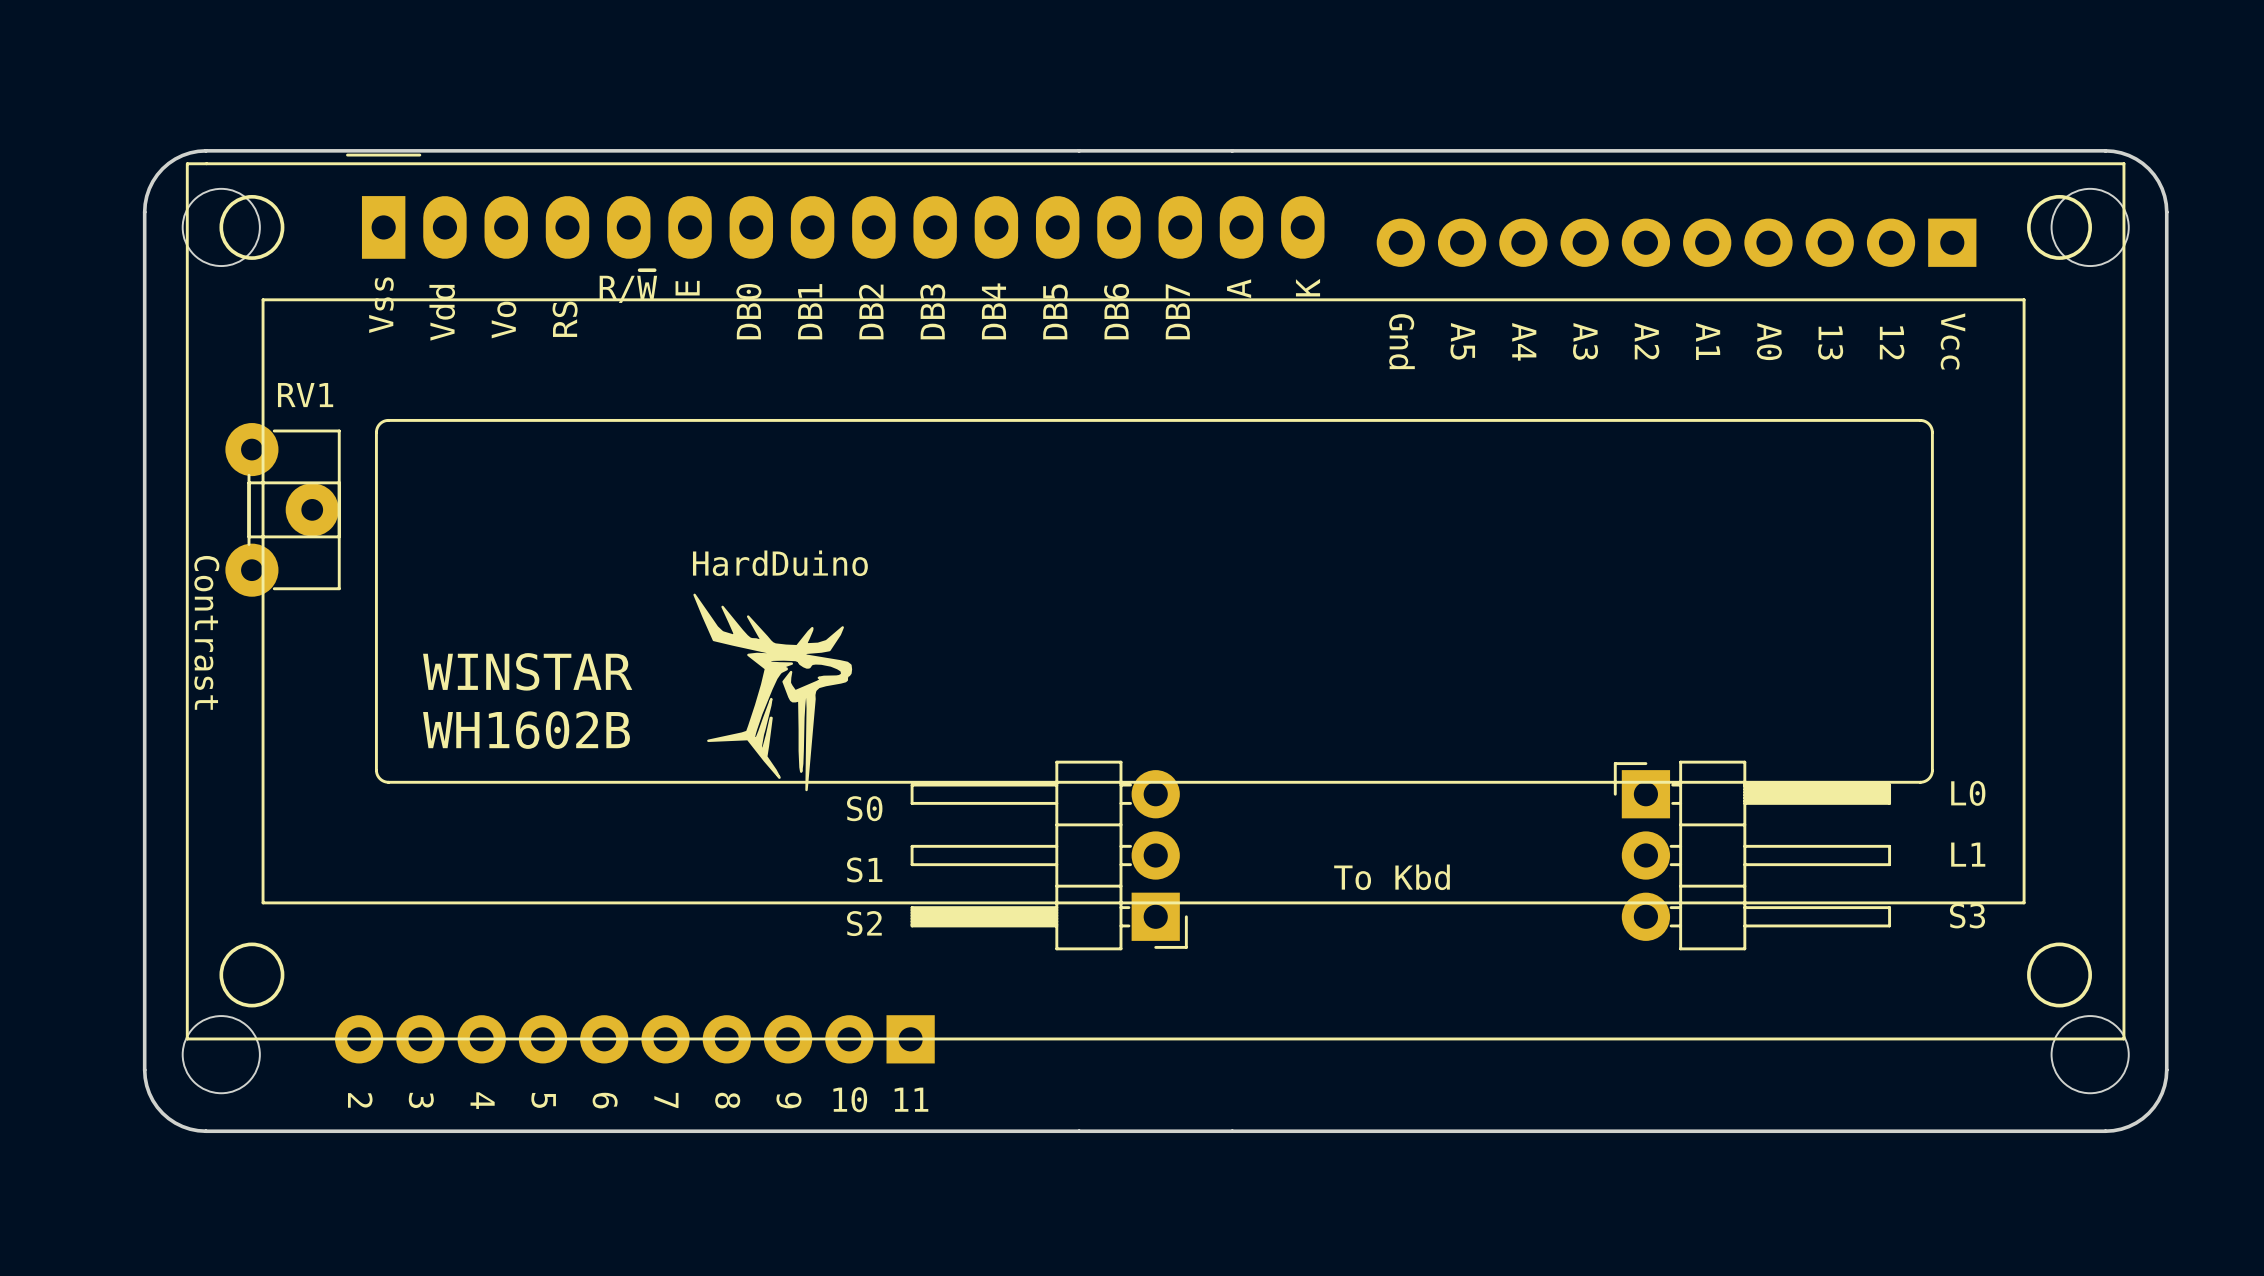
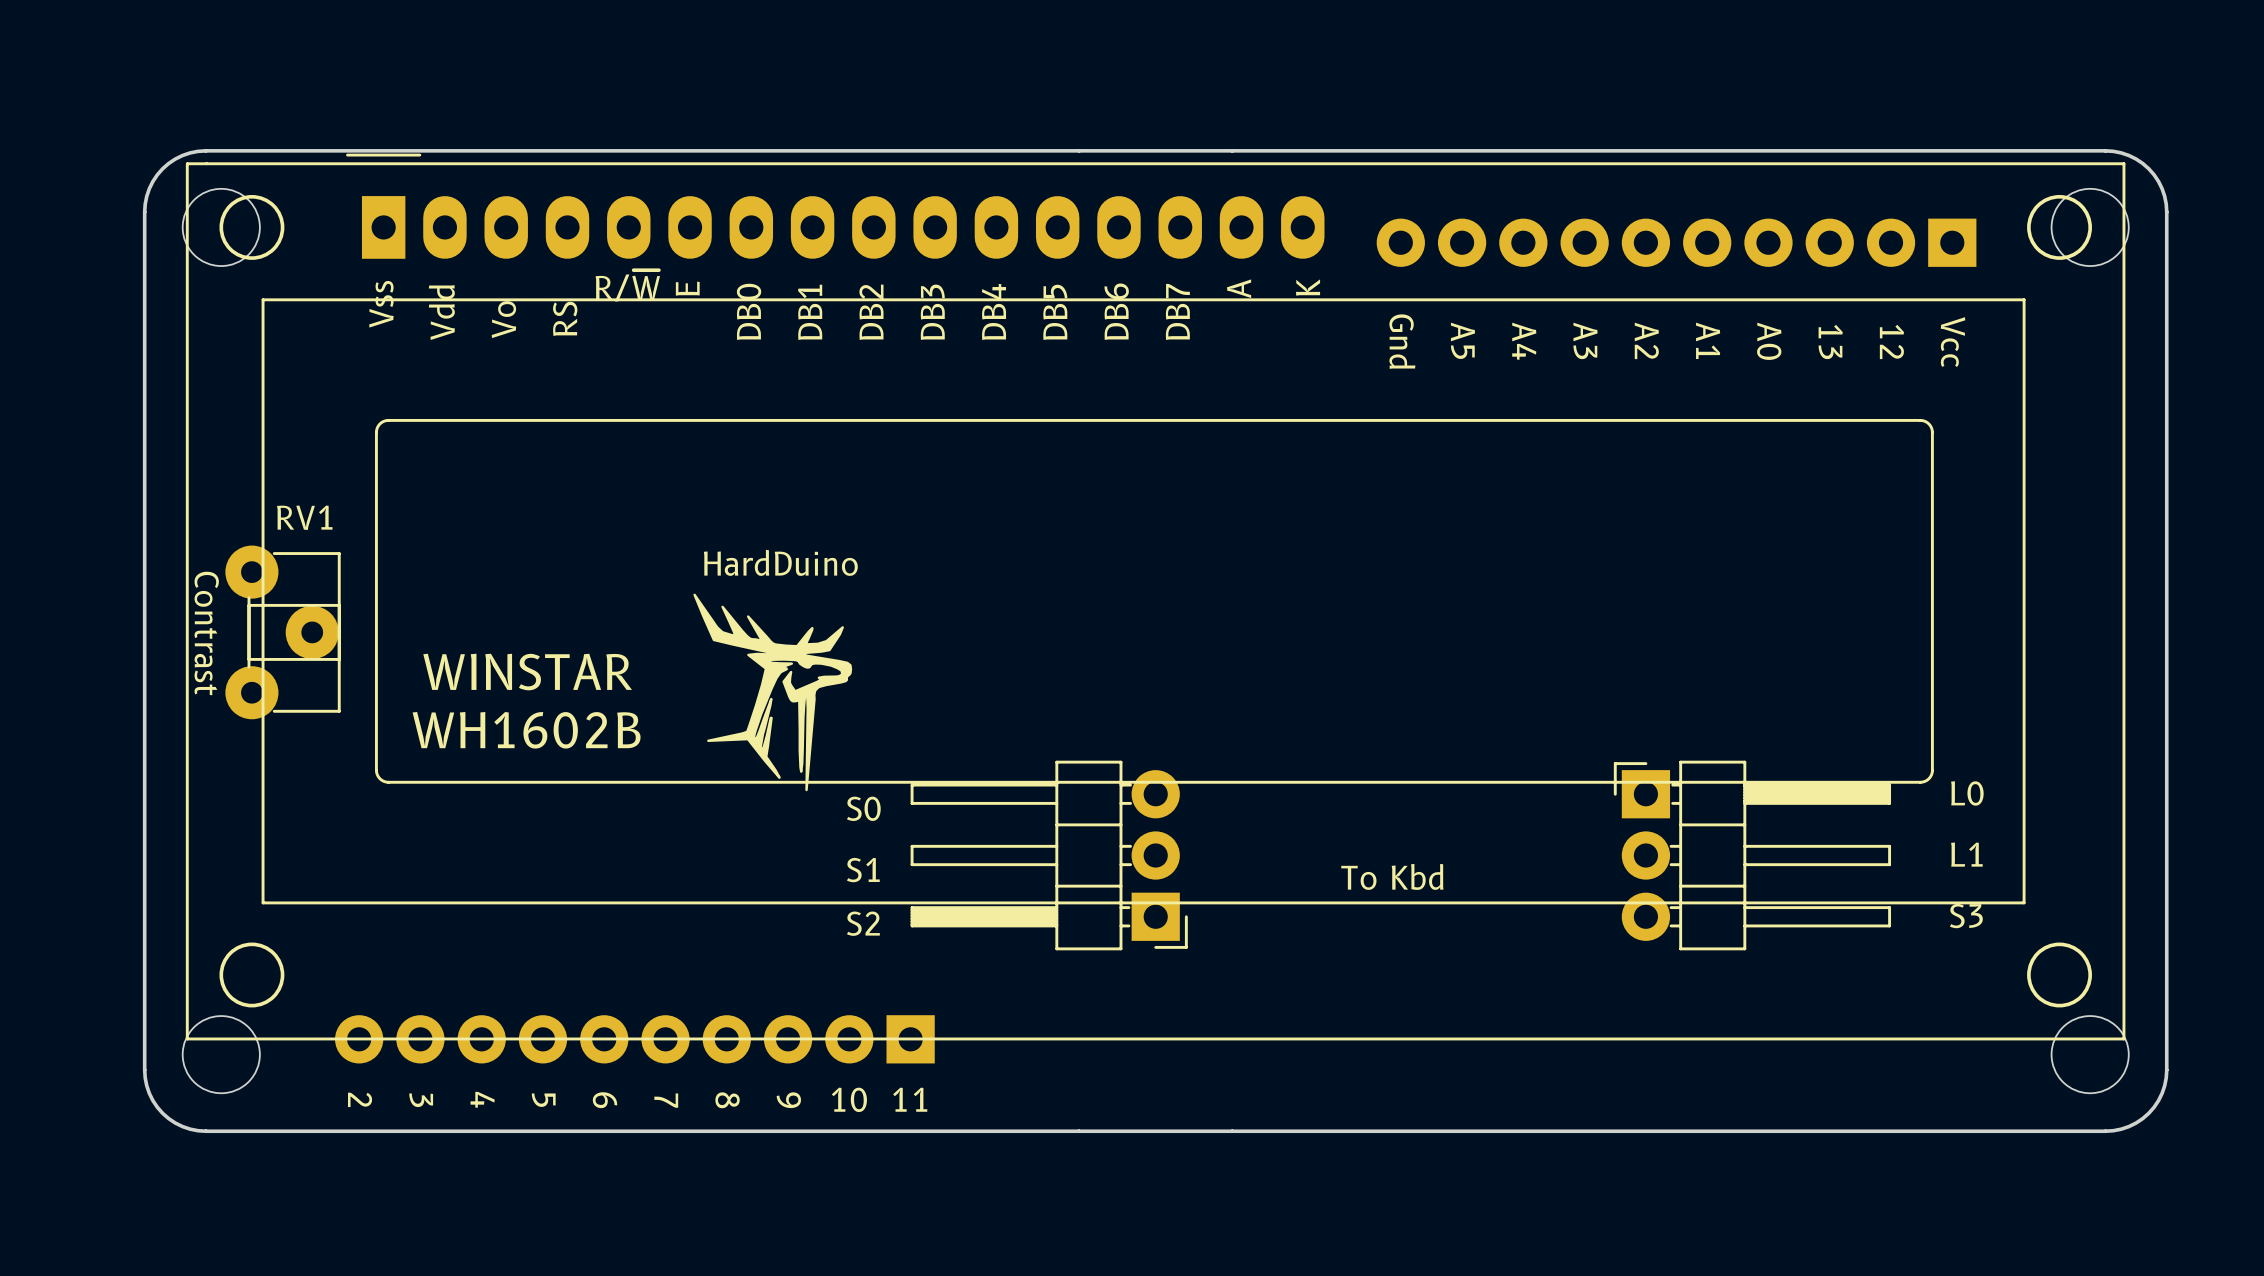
RV1 position: (283, 509) -> (283, 632)

